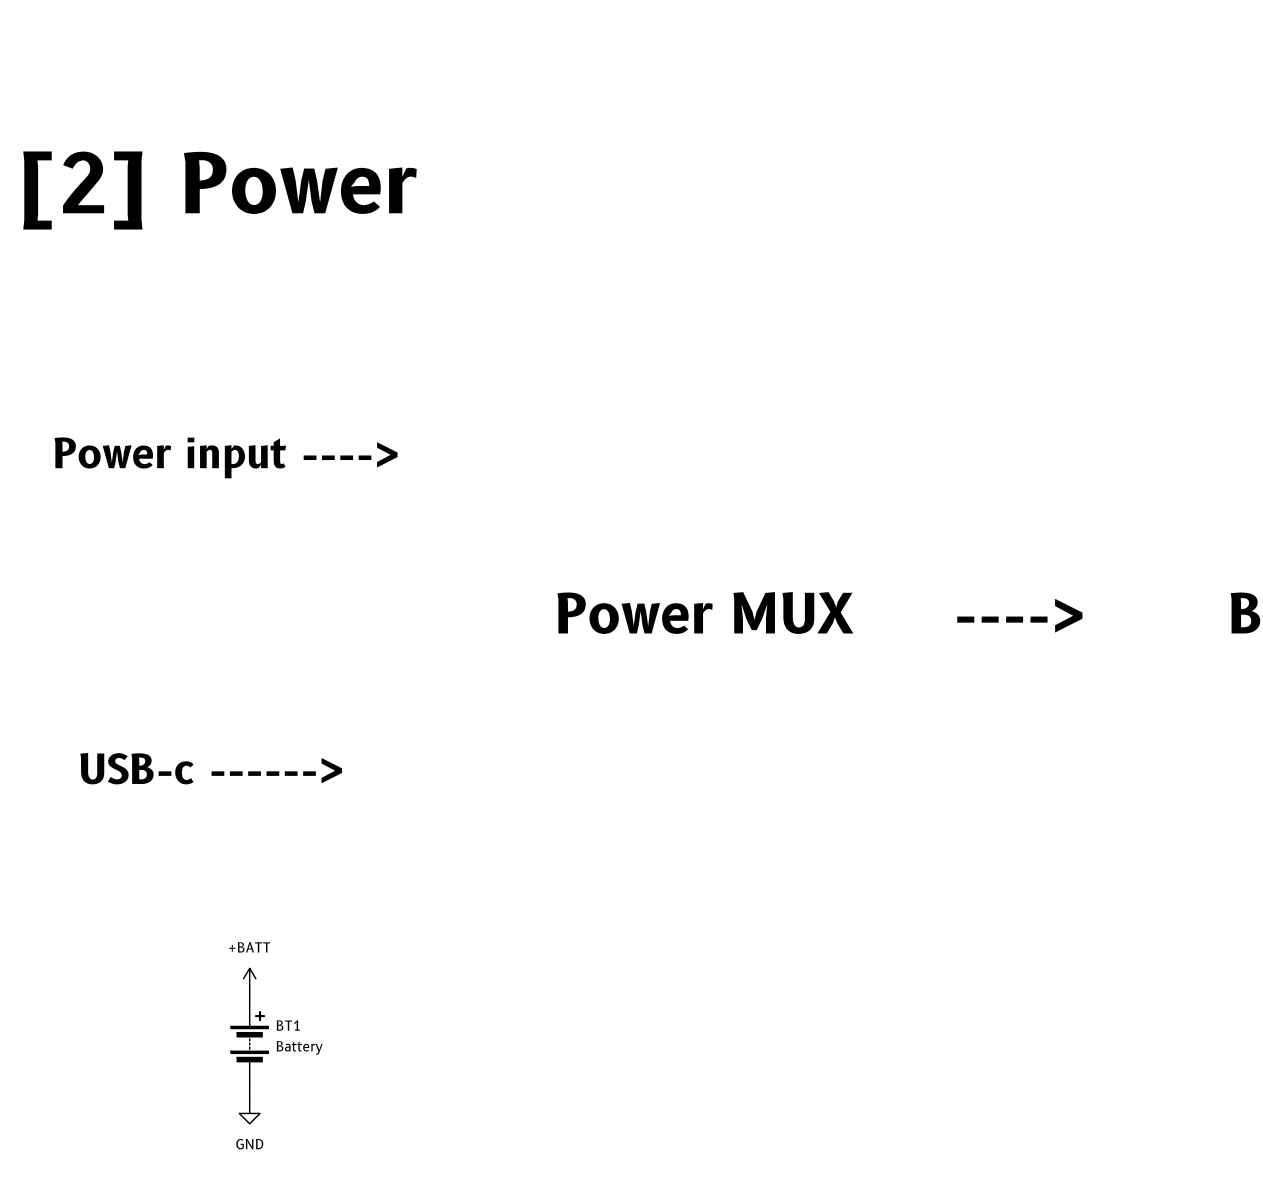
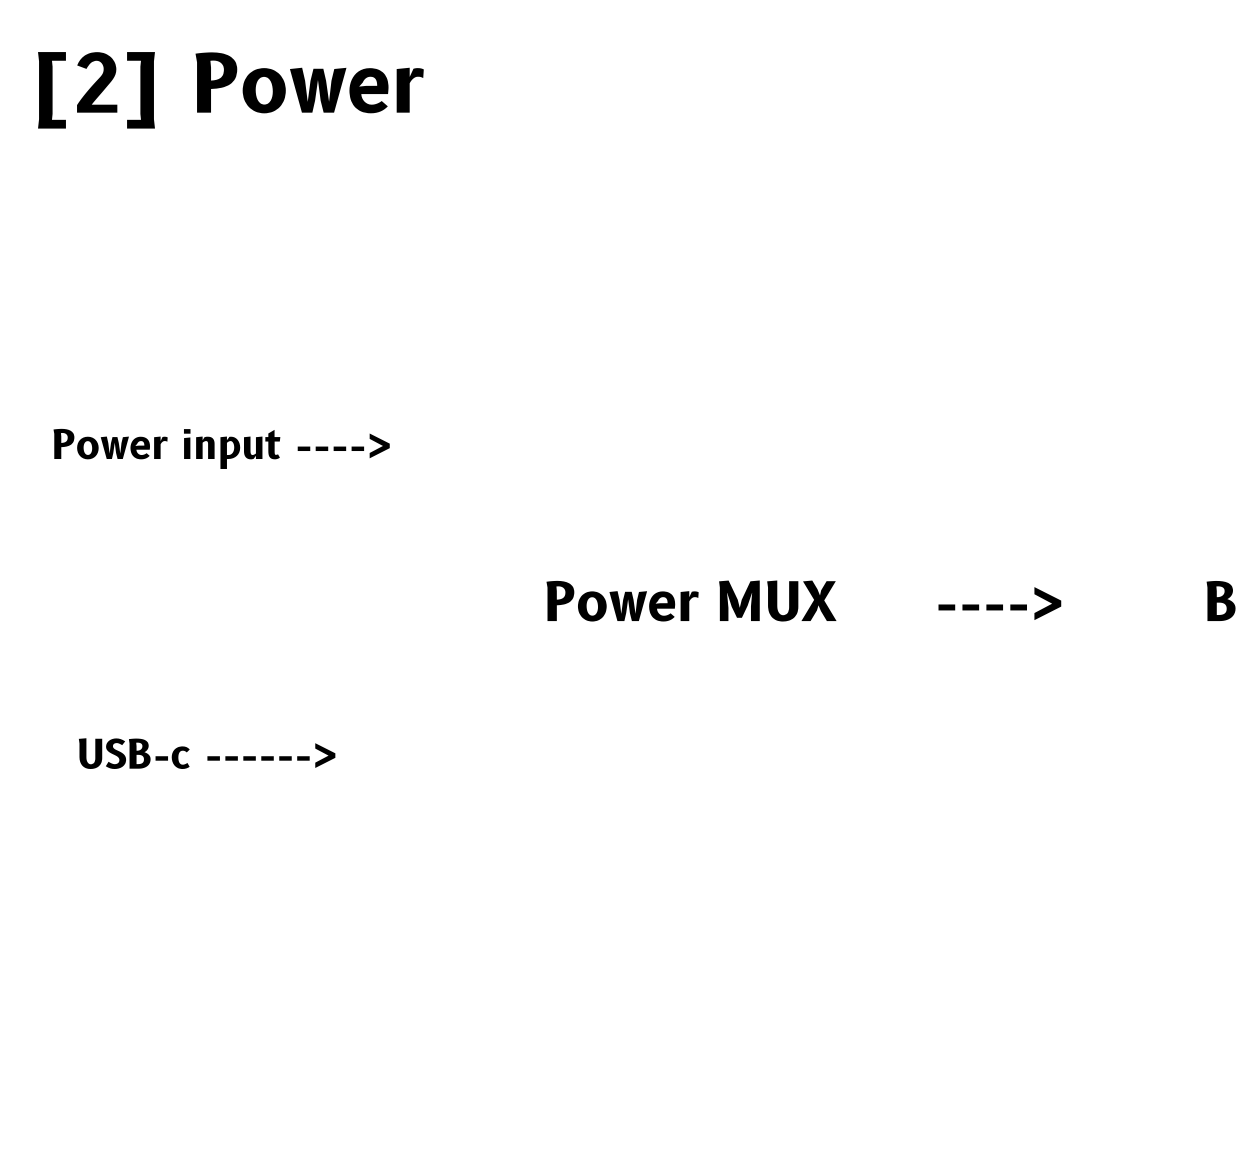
text position: [2] Power (219, 190) -> [2] Power (230, 90)
power symbol: +BATT (249, 978) -> none
wire: (249, 989) (249, 999) -> none
BT1: Battery (249, 1040) -> none
wire: (249, 1082) (249, 1103) -> none
power symbol: GND (249, 1113) -> none

